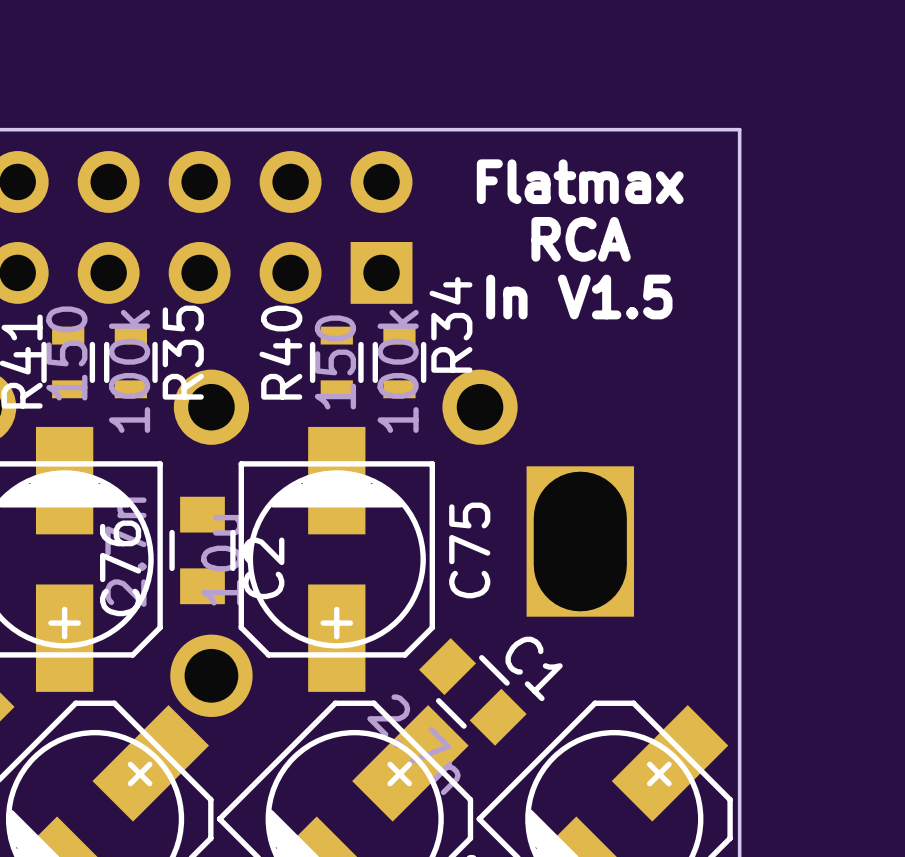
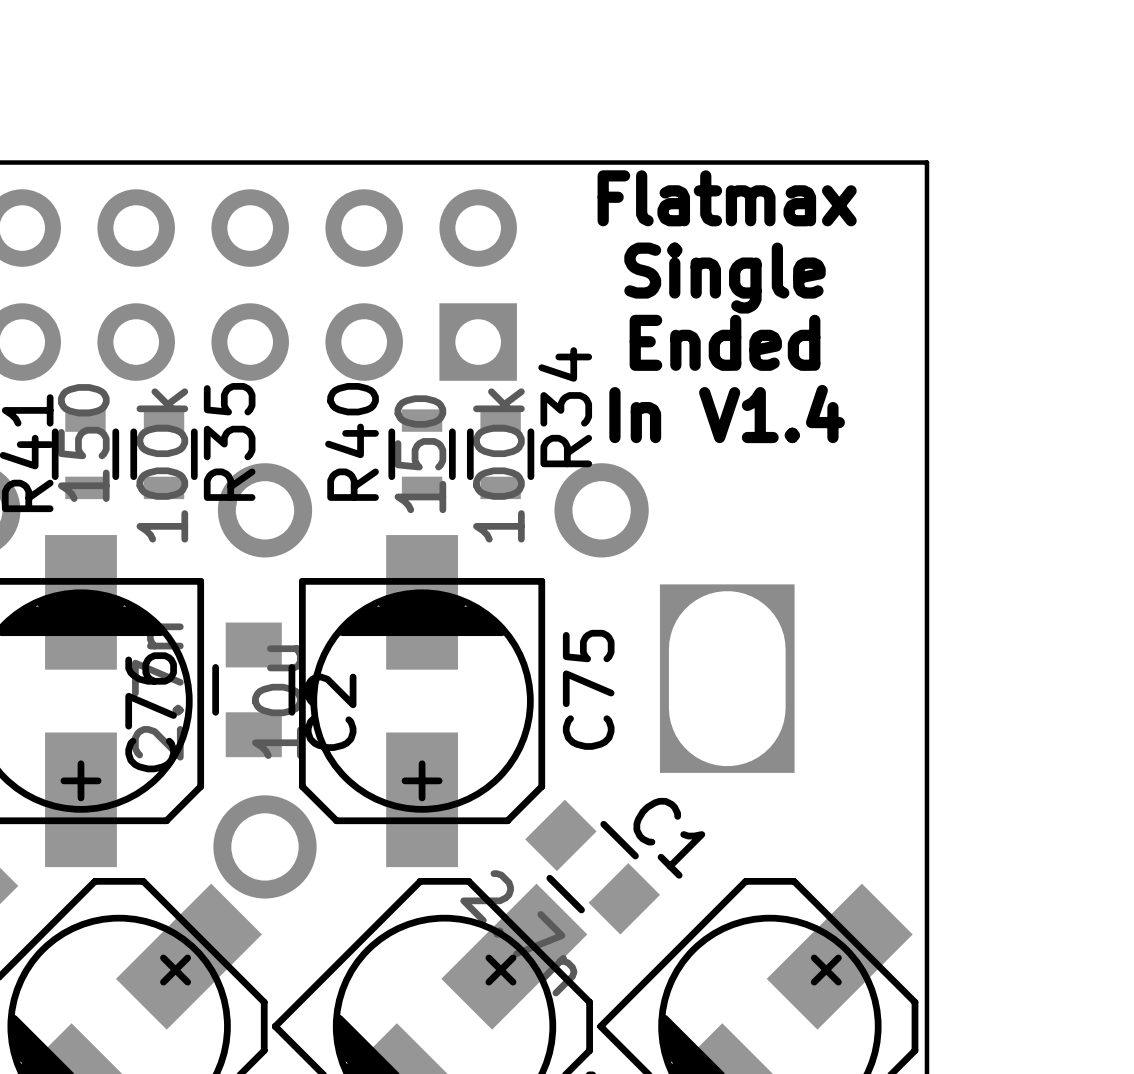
text position: Flatmax (580, 181) -> Flatmax (727, 198)
text: none -> Single (725, 278)
text: RCA (581, 239) -> none
text: none -> Ended (725, 342)
text: In V1.5 (579, 297) -> In V1.4 (727, 414)

